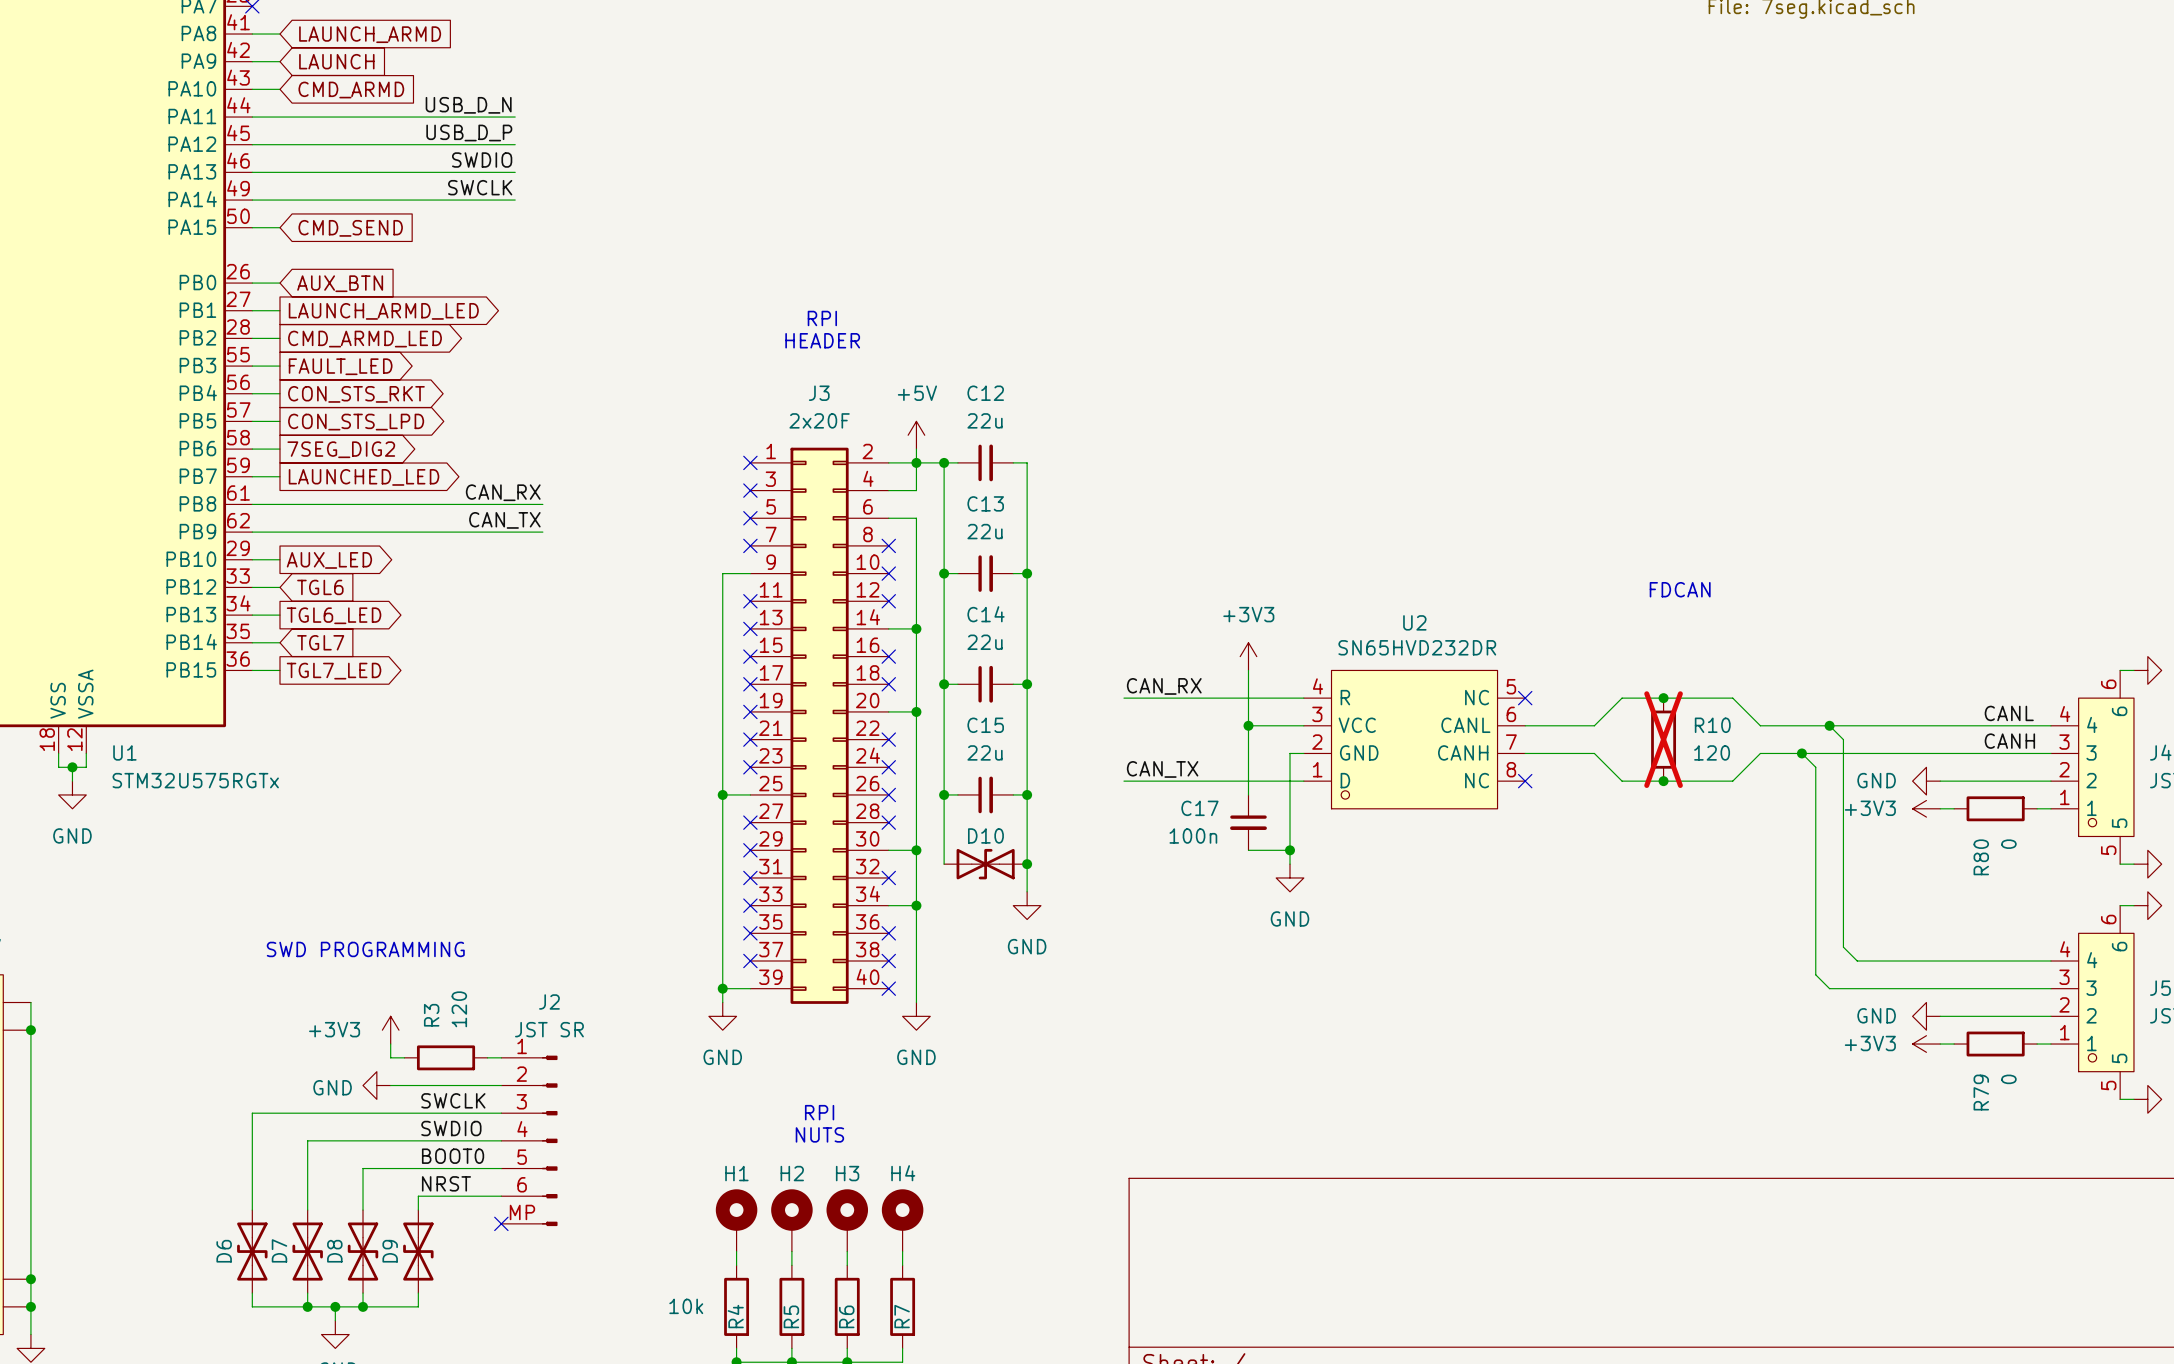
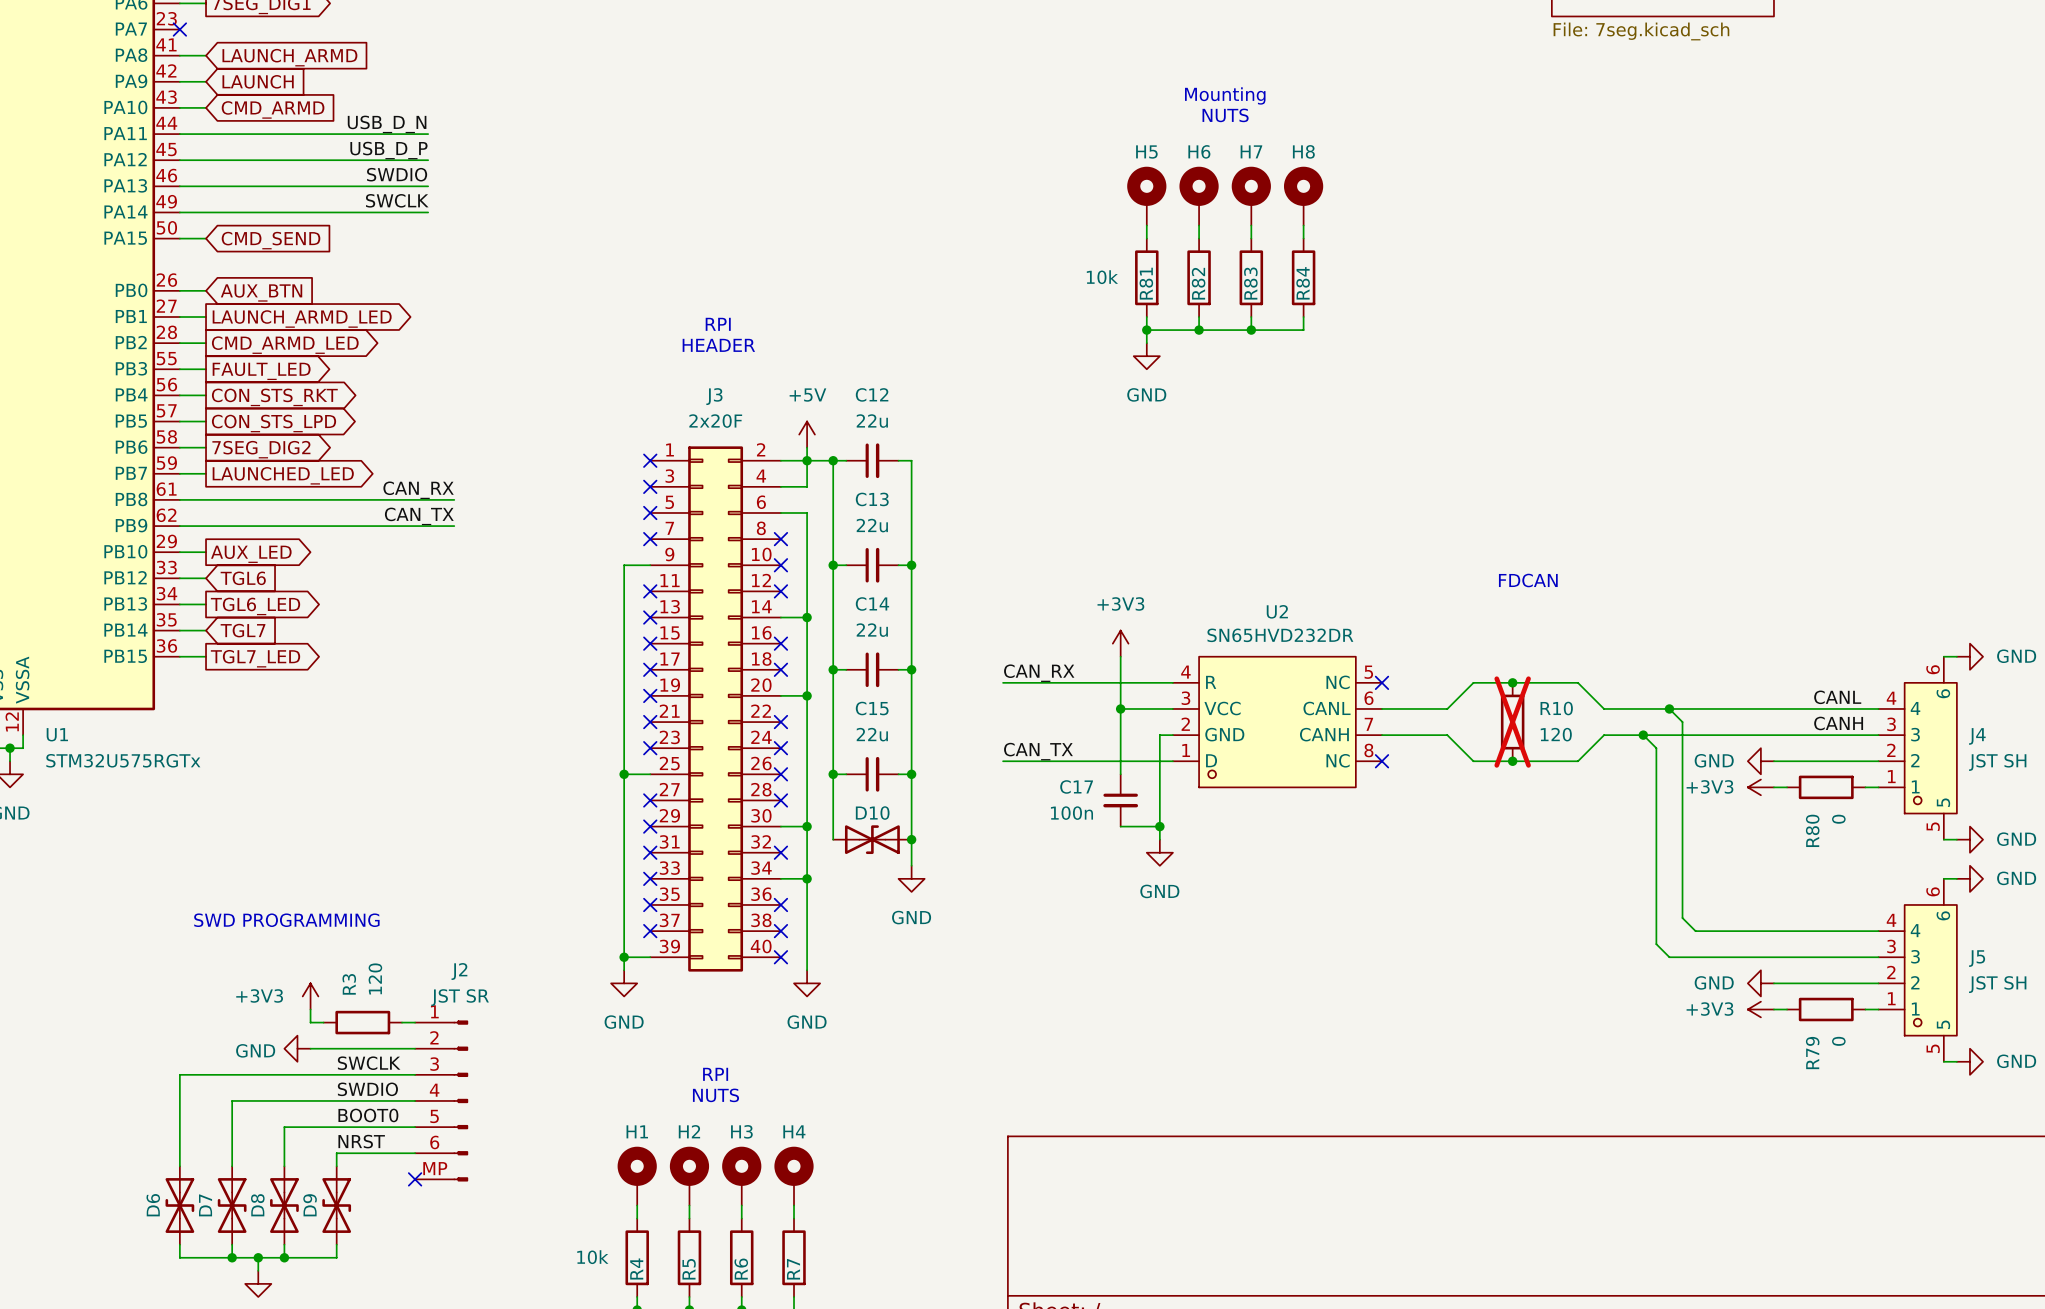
text: none -> Mounting (1225, 95)
text: none -> NUTS (1225, 115)
H5: none -> (1146, 196)
H6: none -> (1199, 196)
H7: none -> (1251, 196)
H8: none -> (1303, 196)
wire: none -> (1146, 225) (1146, 238)
wire: none -> (1199, 225) (1199, 238)
wire: none -> (1251, 225) (1251, 238)
wire: none -> (1303, 225) (1303, 238)
R81: none -> 10k (1146, 277)
R82: none -> (1199, 277)
R83: none -> (1251, 277)
R84: none -> (1303, 277)
wire: none -> (1146, 317) (1146, 343)
wire: none -> (1199, 317) (1199, 330)
wire: none -> (1251, 317) (1251, 330)
wire: none -> (1303, 317) (1303, 330) (1146, 330)
junction: none -> (1146, 330)
junction: none -> (1199, 330)
junction: none -> (1251, 330)
power symbol: none -> GND (1146, 356)

